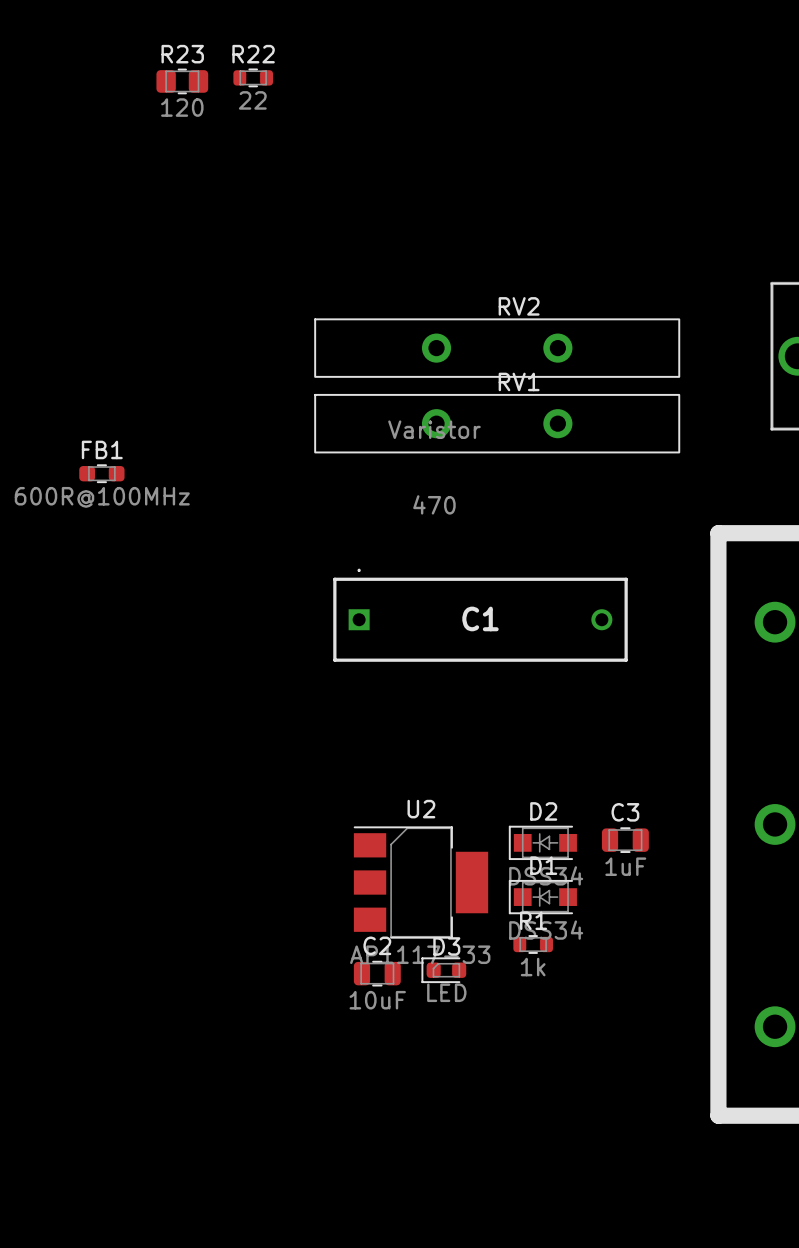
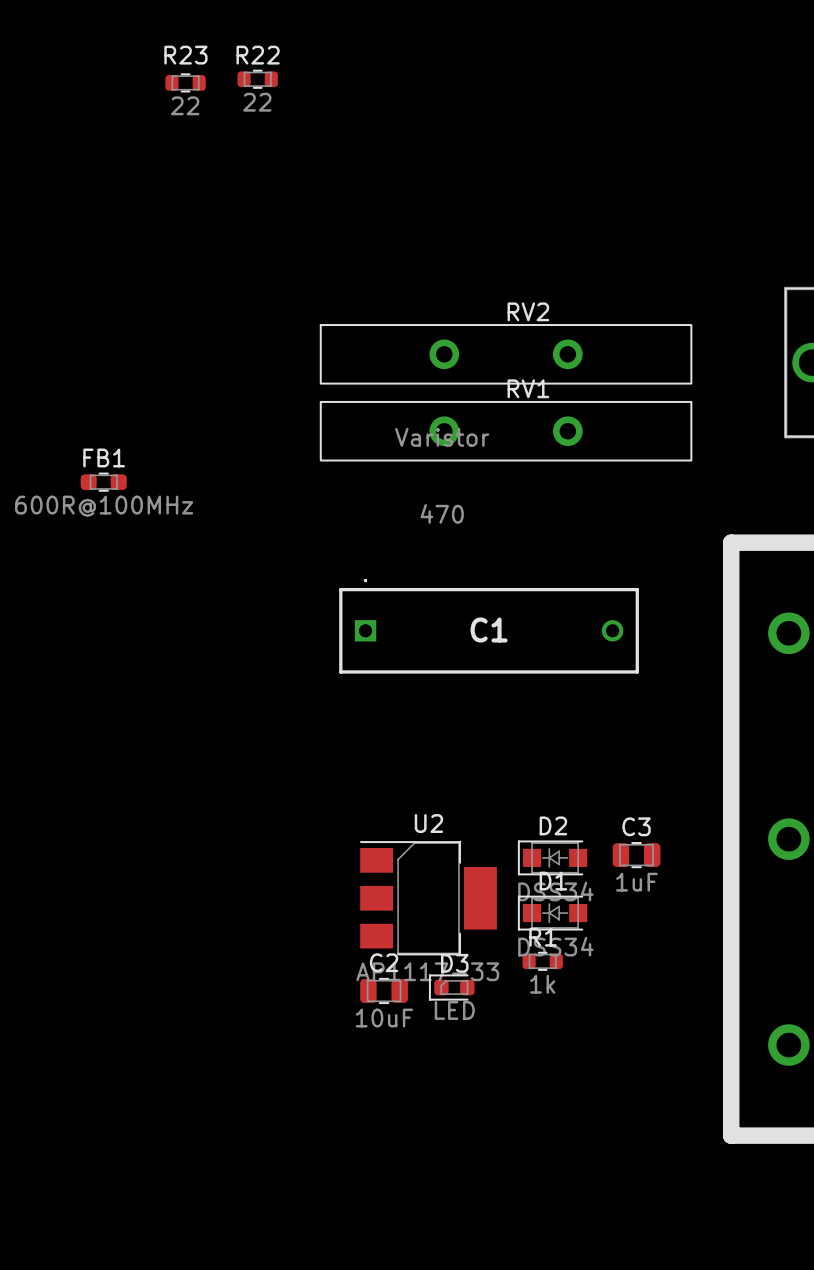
R23 footprint: [156, 68, 209, 95] -> [165, 73, 206, 93]
R23 value: 120 (182, 107) -> 22 (185, 105)

